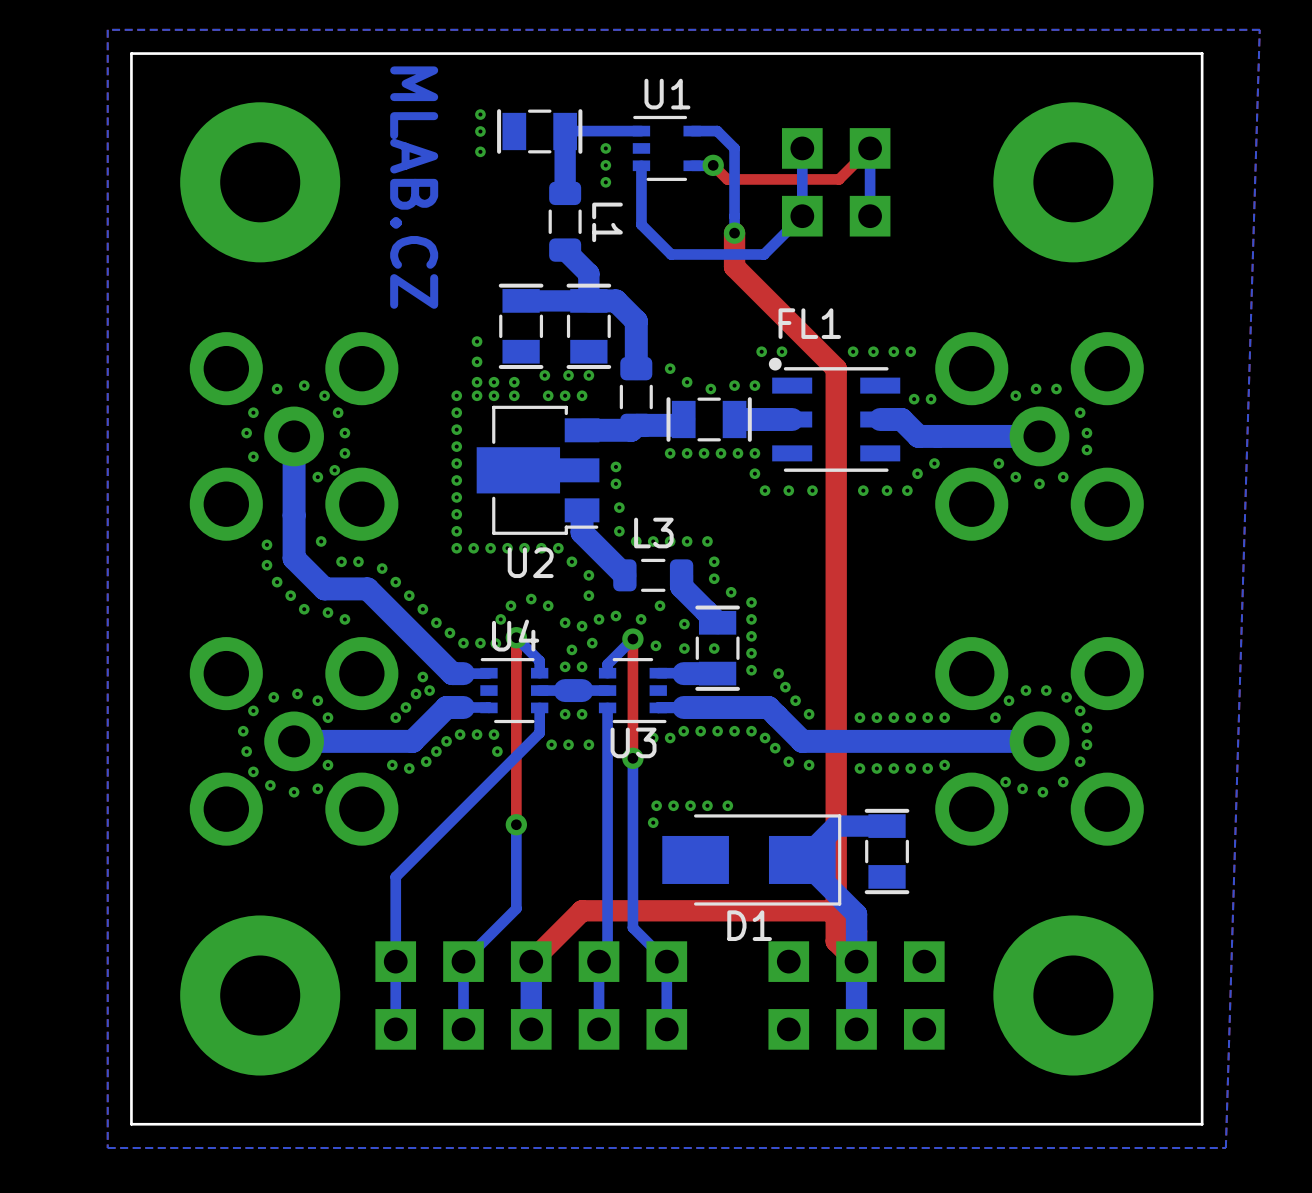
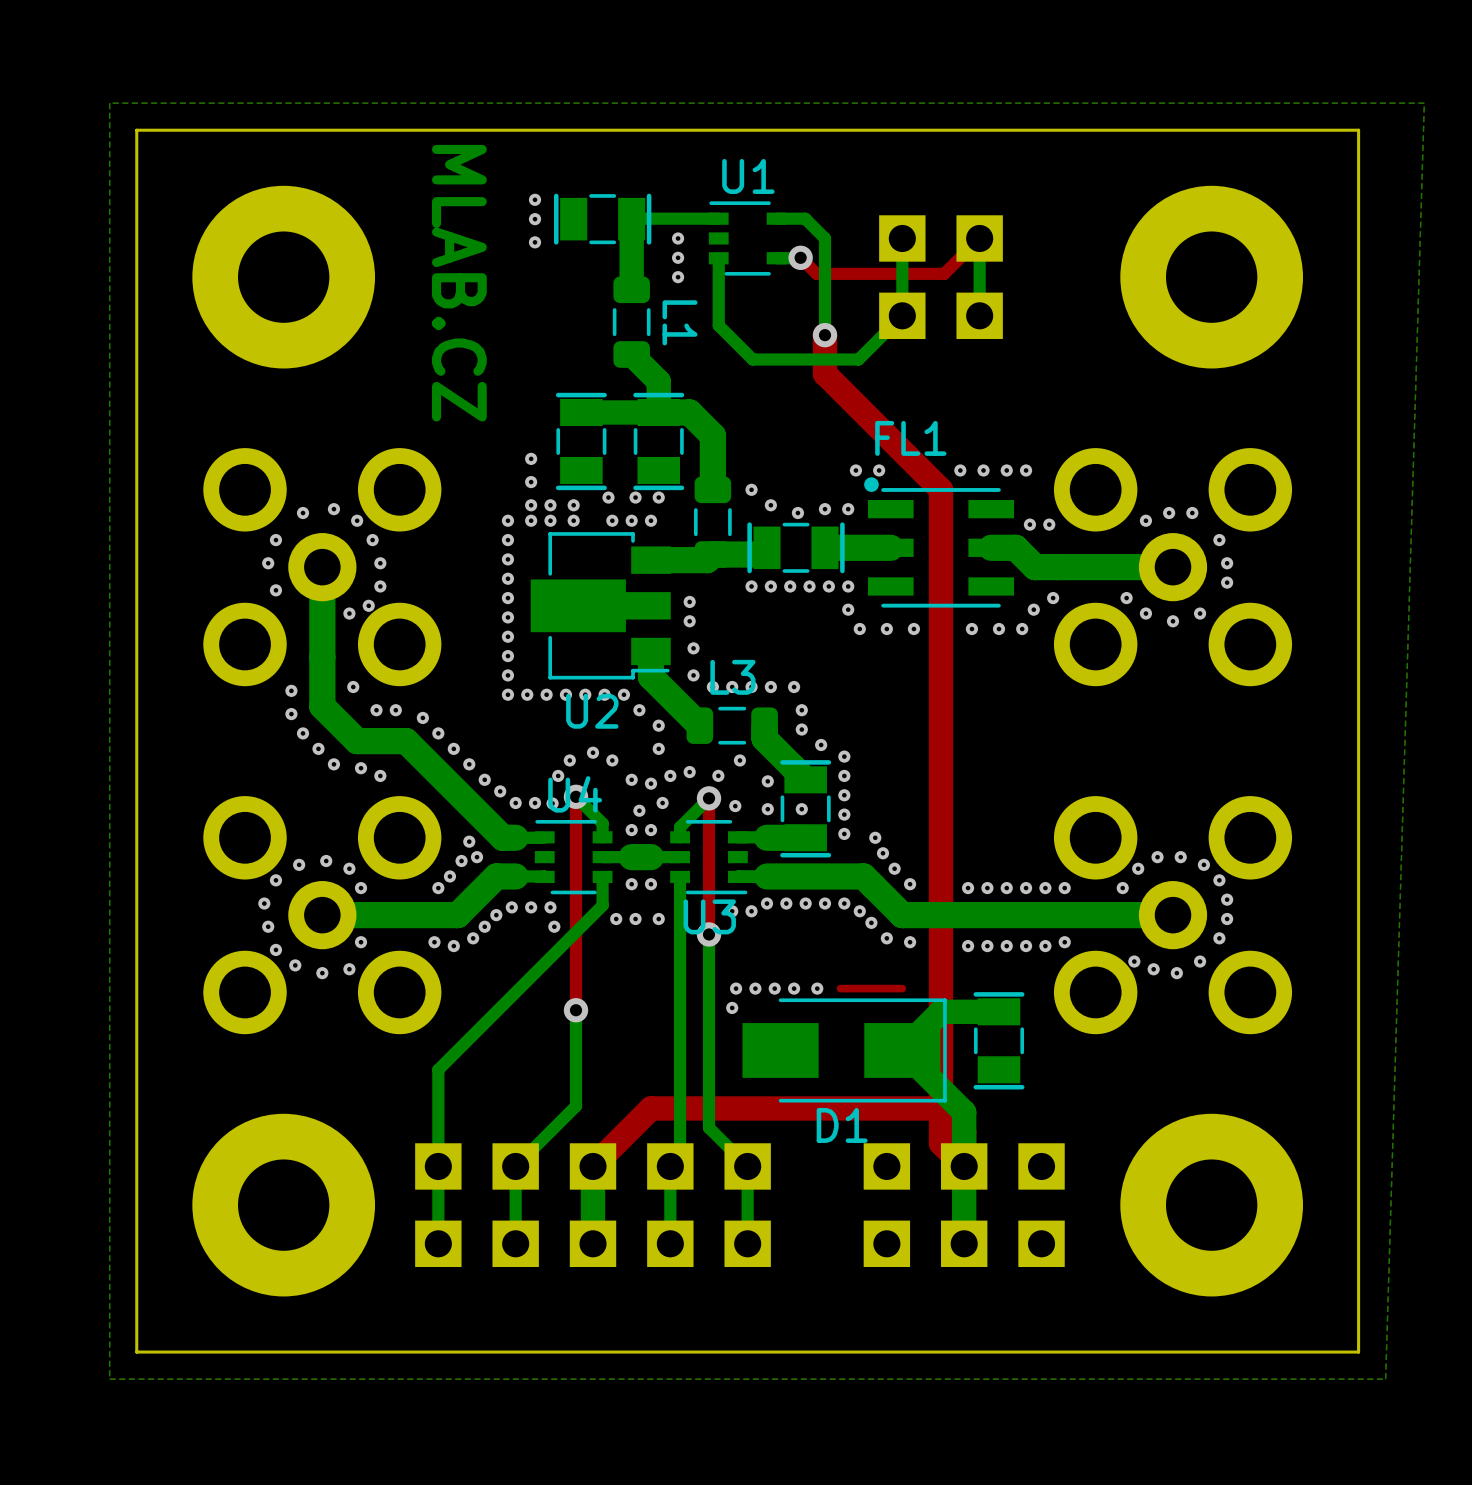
top track: none -> (902, 988) (840, 988)

